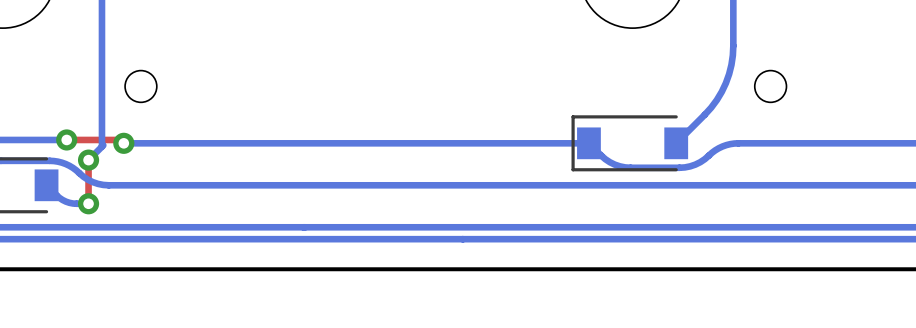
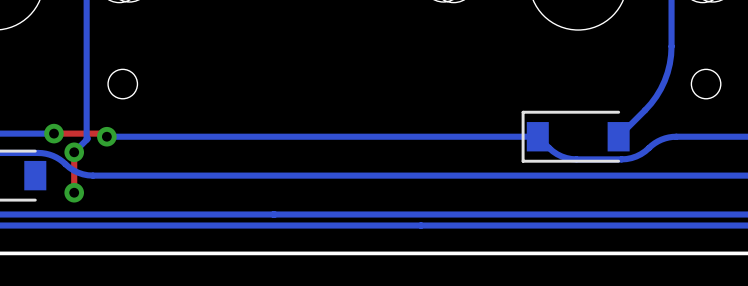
bottom track: (46, 185) (65, 201) (88, 203) -> none

